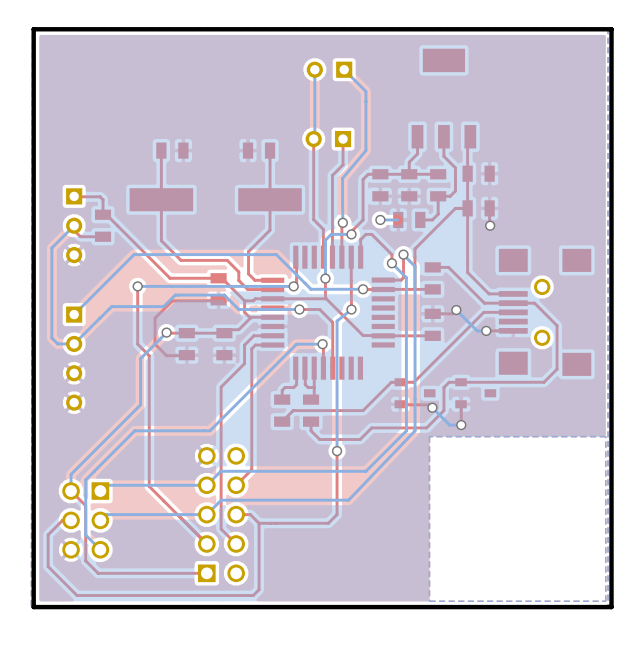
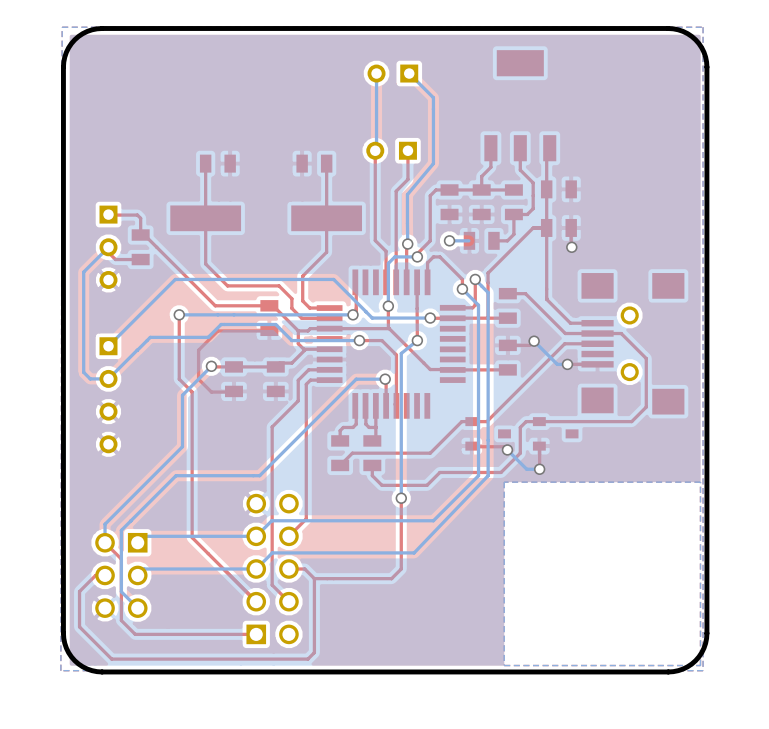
board edge: (68, 29) (33, 29) (33, 63) -> (102, 28) (87, 31) (74, 39) (66, 52) (63, 67)
board edge: (576, 29) (611, 29) (611, 63) -> (668, 28) (683, 31) (695, 39) (703, 52) (706, 67)
board edge: (33, 572) (33, 607) (68, 607) -> (63, 633) (66, 648) (74, 660) (87, 669) (102, 671)
board edge: (611, 572) (611, 607) (576, 607) -> (706, 633) (703, 648) (695, 660) (683, 669) (668, 671)

